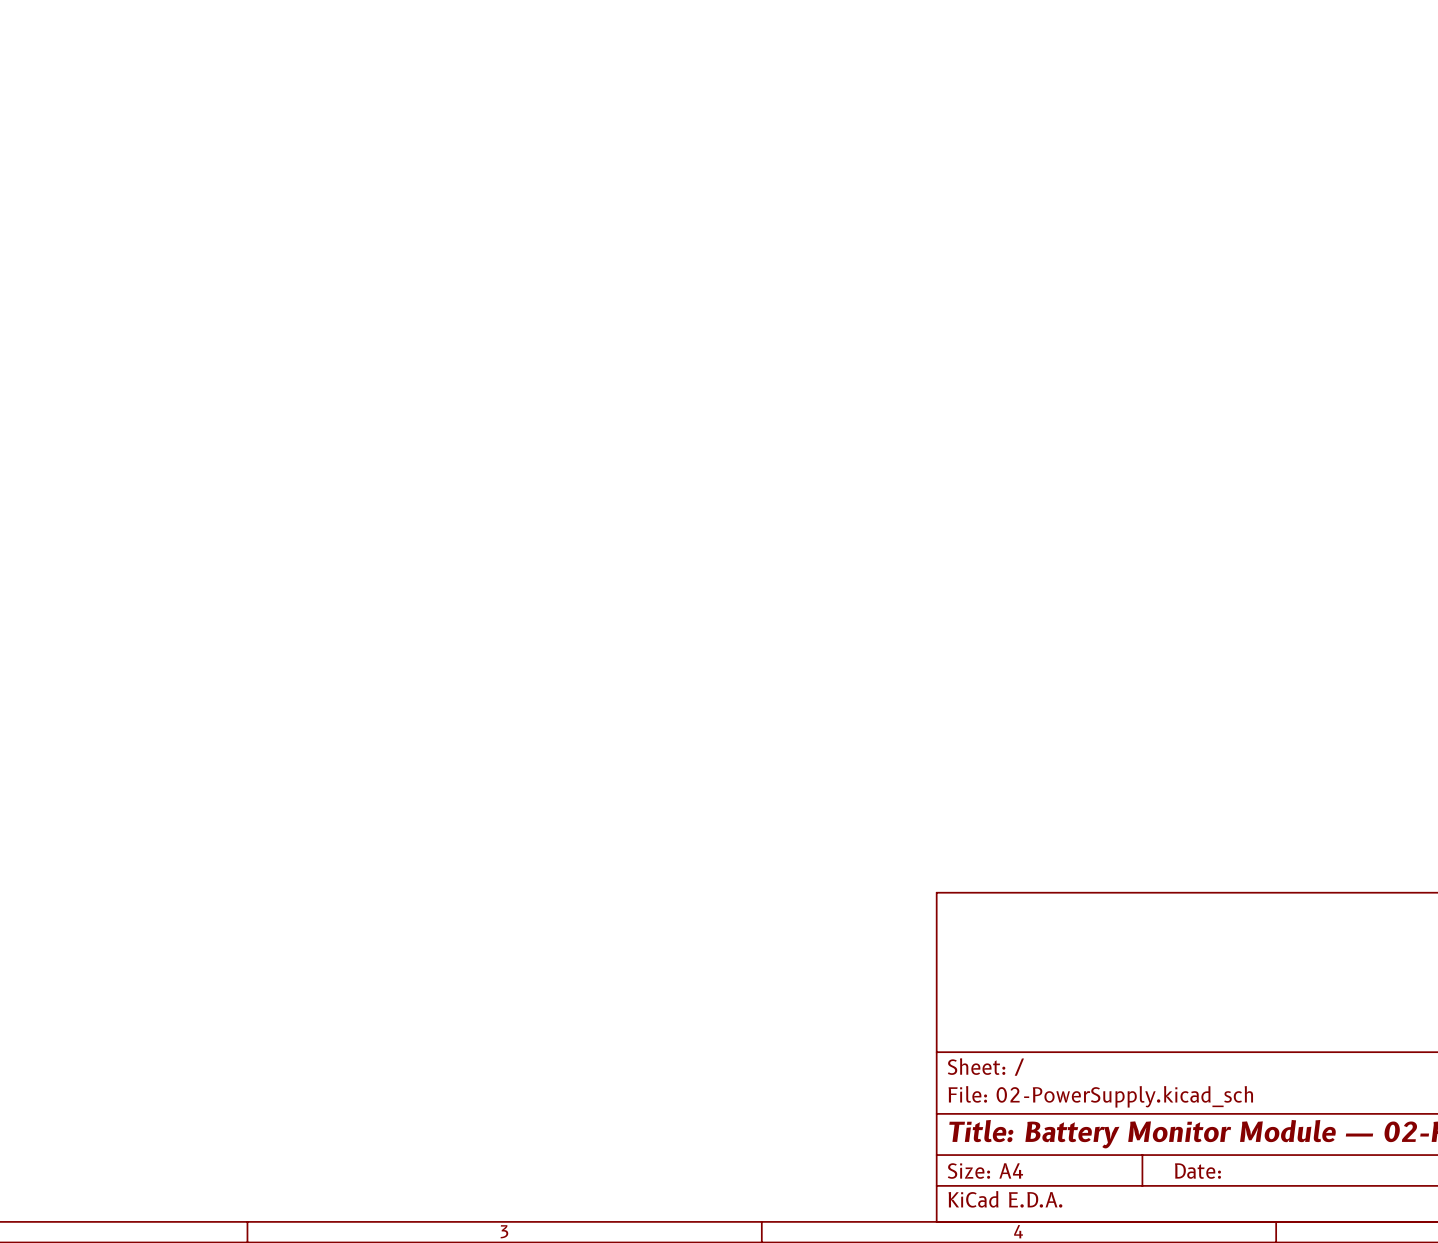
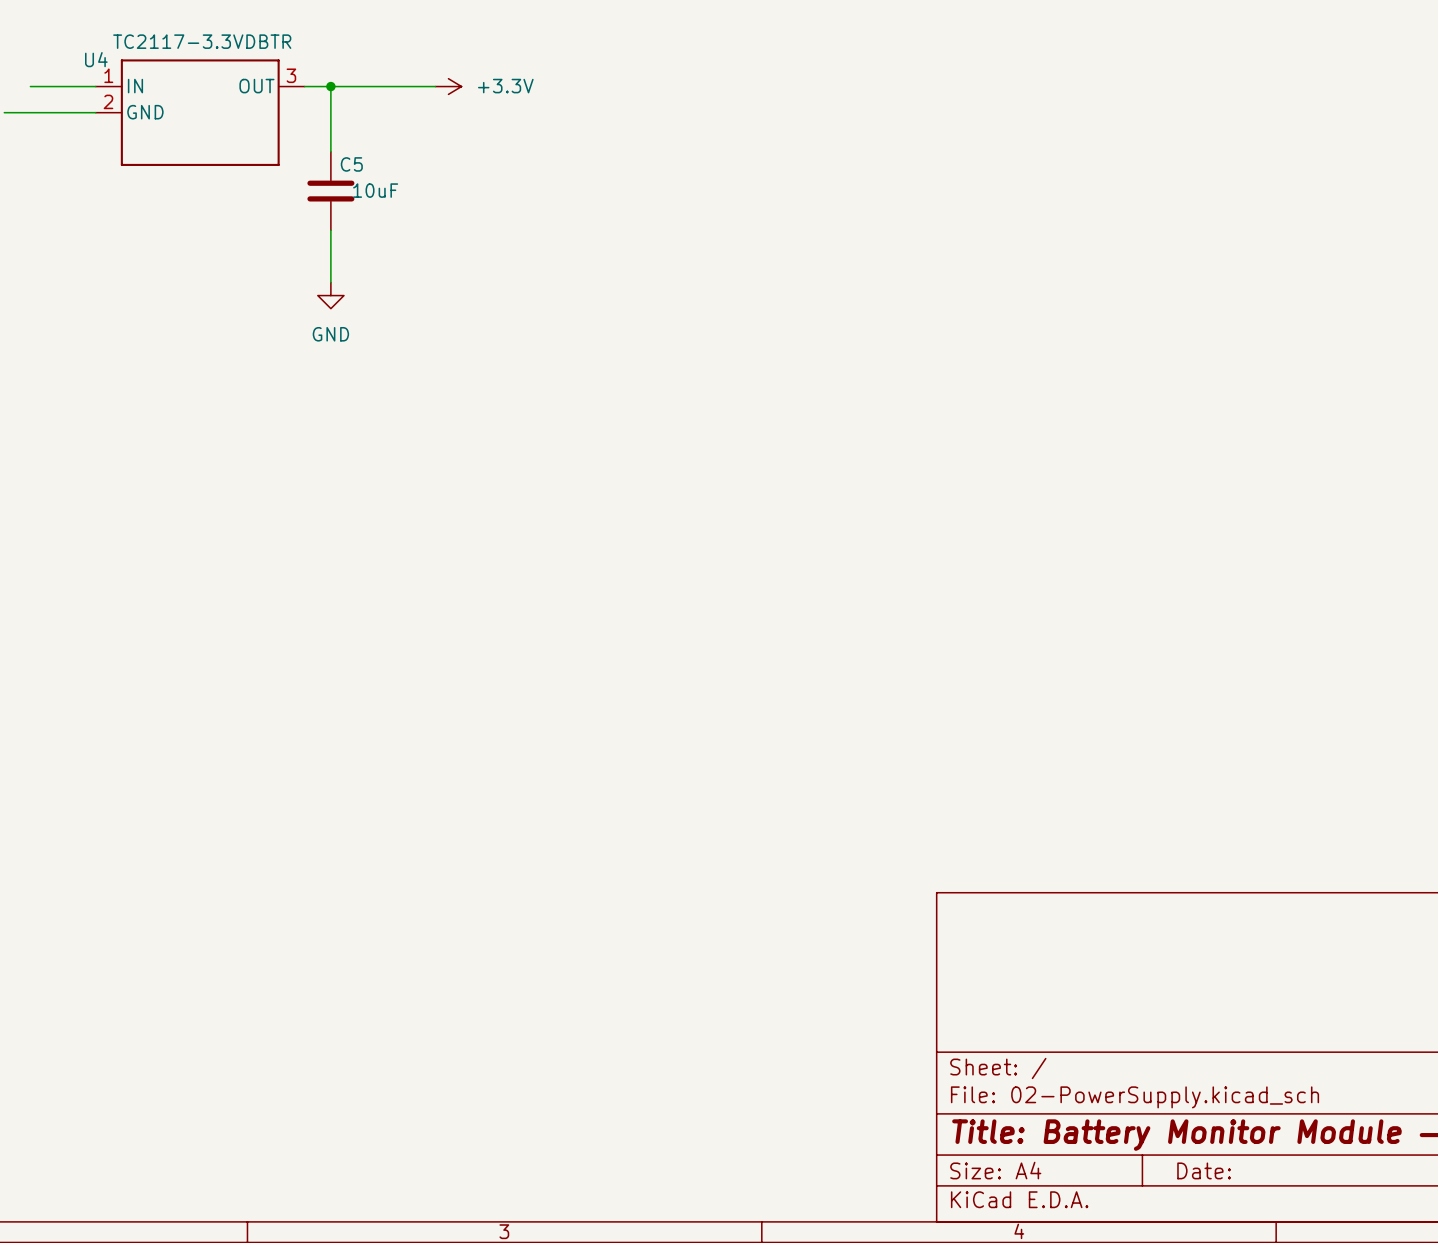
wire: none -> (30, 86) (95, 86)
wire: none -> (304, 86) (435, 86)
wire: none -> (330, 86) (330, 151)
junction: none -> (330, 86)
power symbol: none -> +3.3V (448, 86)
wire: none -> (4, 112) (95, 112)
U4: none -> TC2117-3.3VDBTR (200, 112)
C5: none -> 10uF (330, 191)
wire: none -> (330, 230) (330, 282)
power symbol: none -> GND (330, 295)

